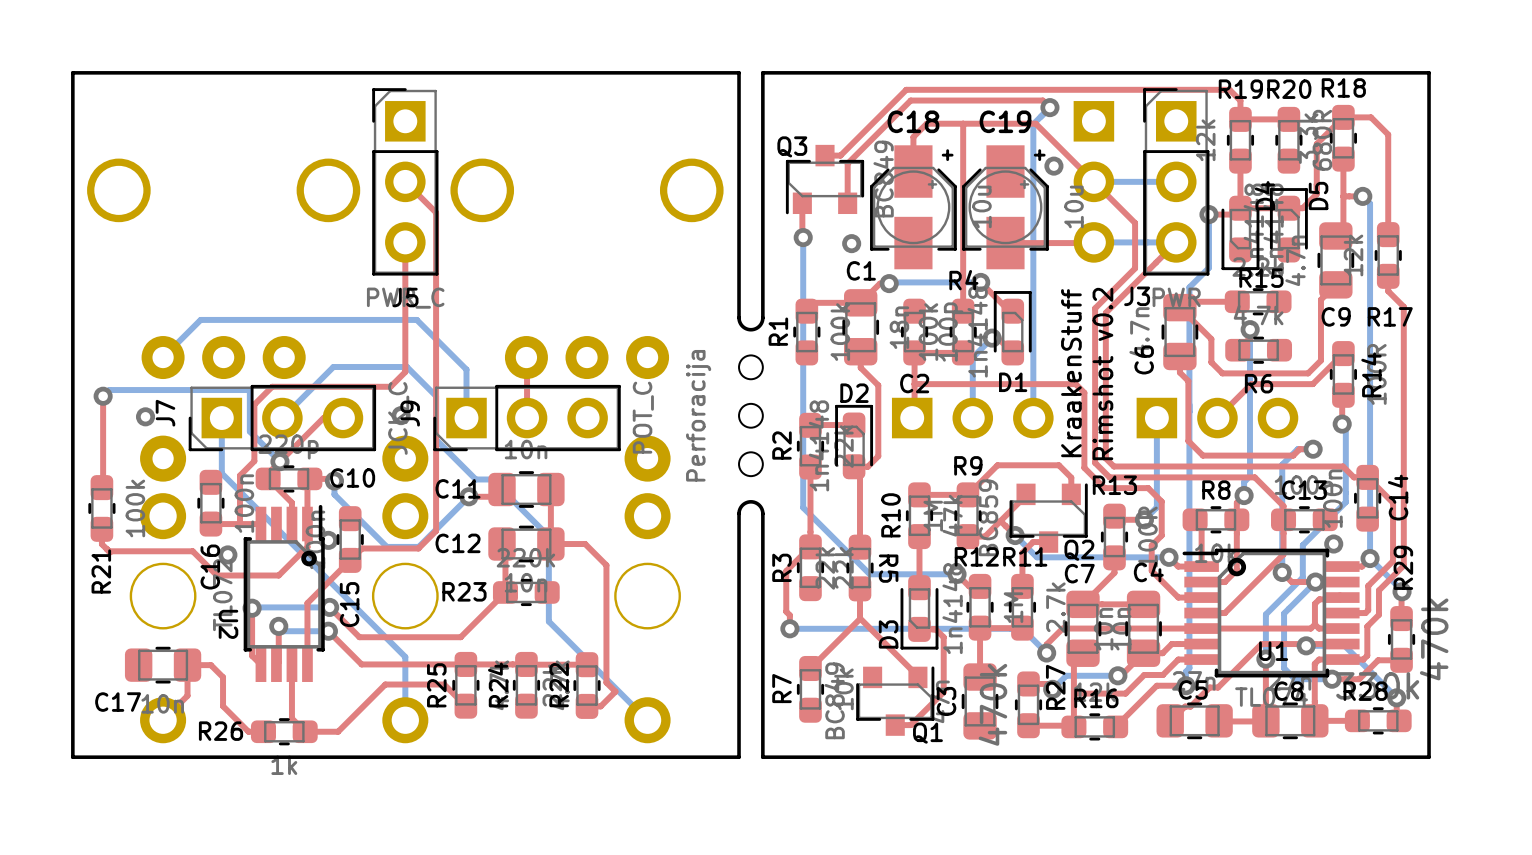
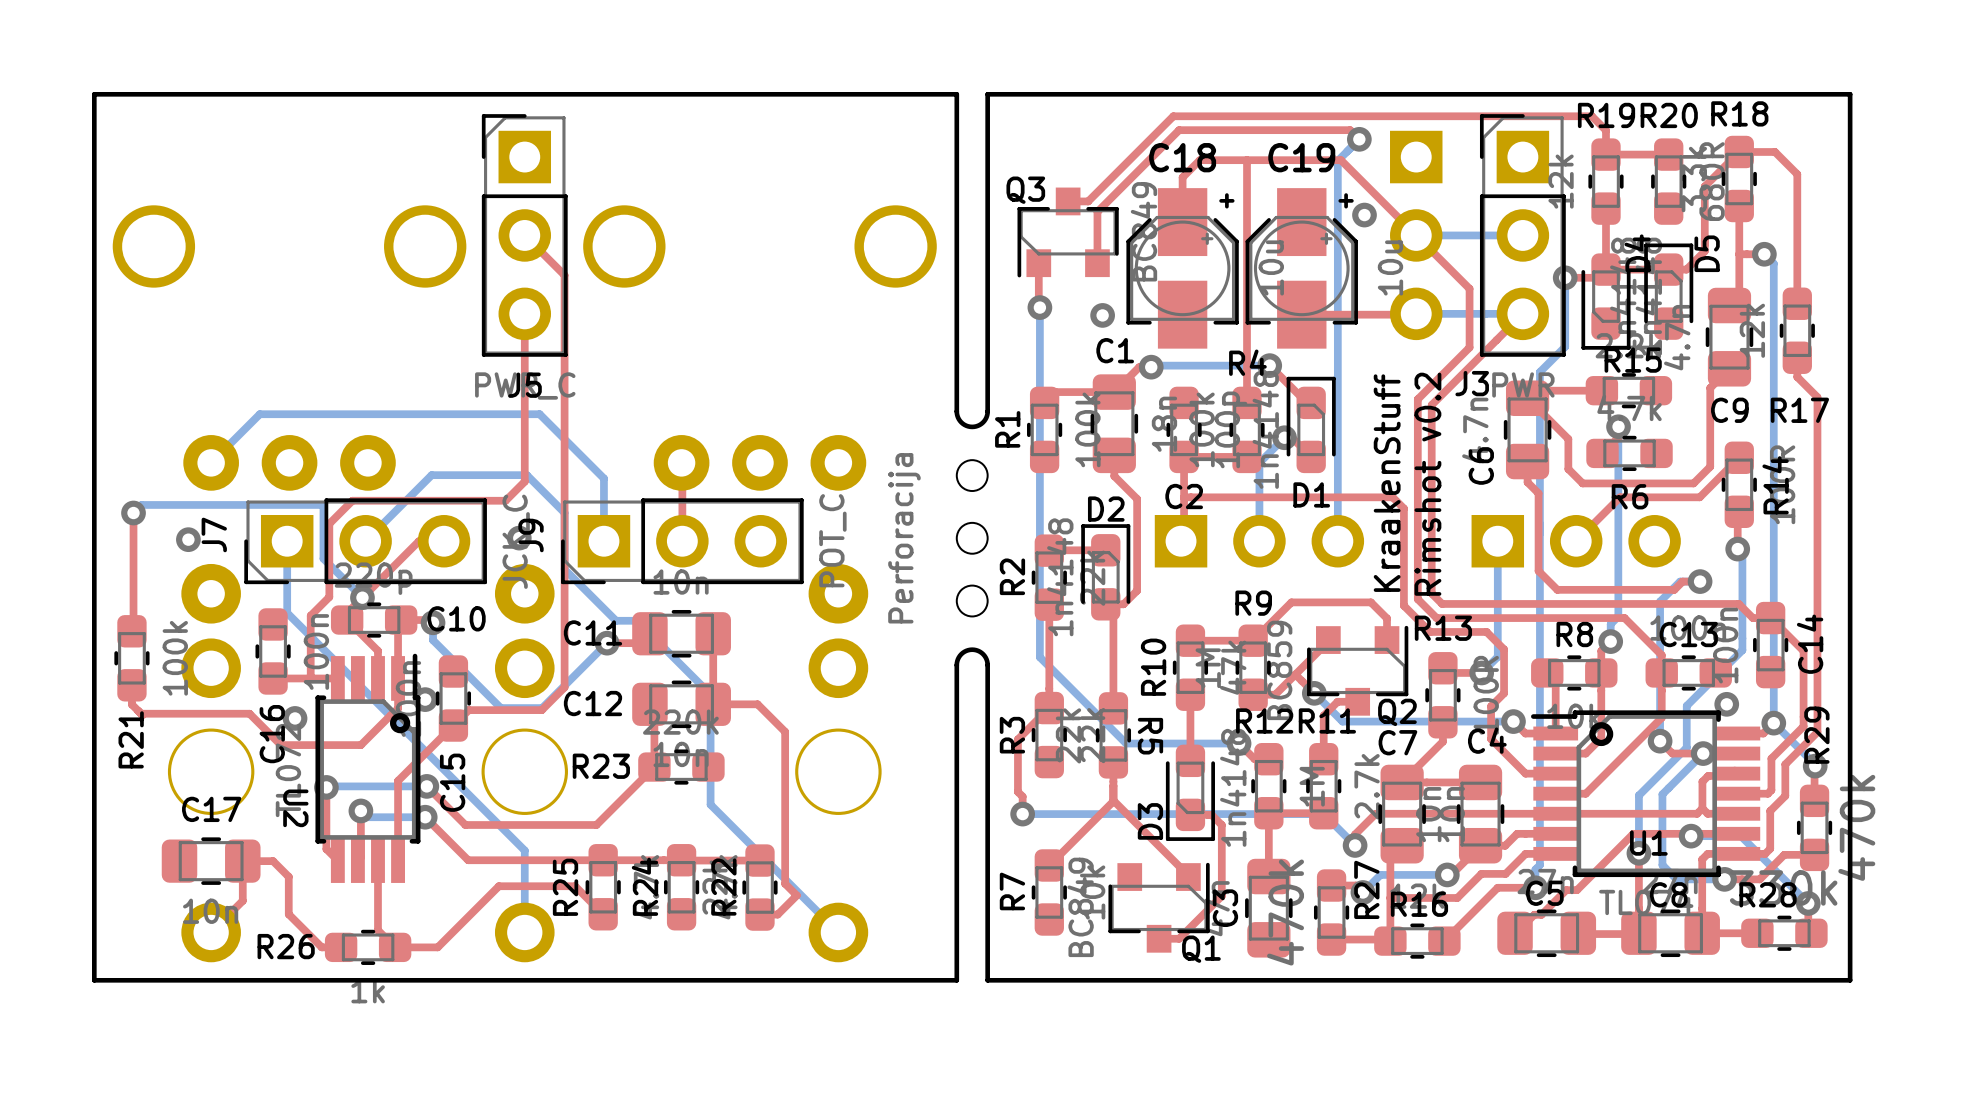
C17 name position: C17 (118, 702) -> C17 (211, 809)

